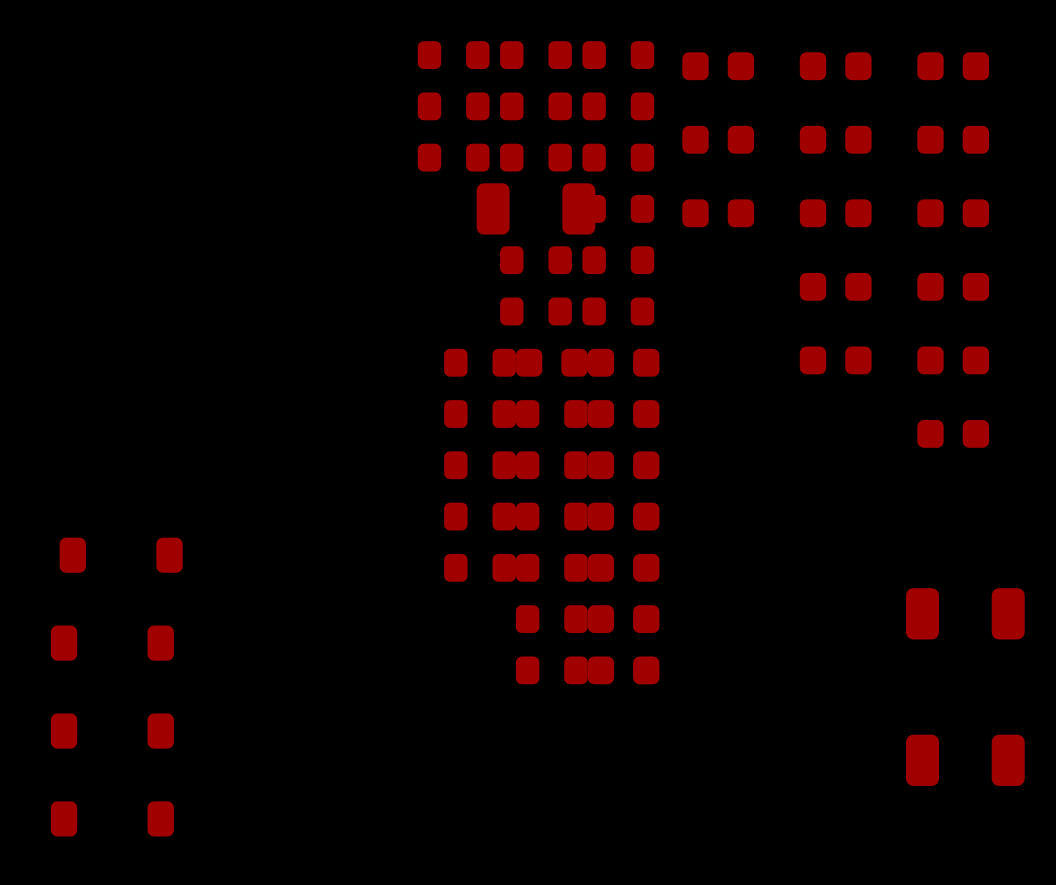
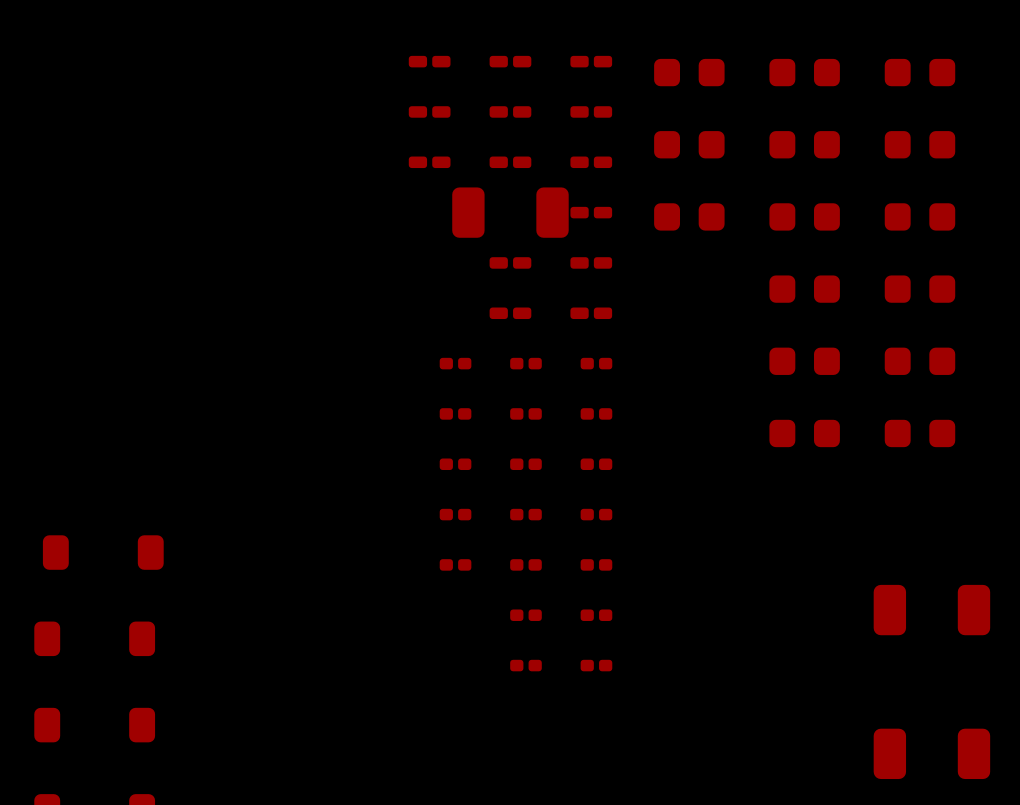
part footprint: [417, 41, 490, 70] -> [408, 55, 451, 68]
part footprint: [500, 41, 572, 70] -> [489, 55, 532, 68]
part footprint: [582, 41, 655, 70] -> [570, 55, 613, 68]
part footprint: [417, 92, 490, 121] -> [408, 106, 451, 118]
part footprint: [500, 92, 572, 121] -> [489, 106, 532, 118]
part footprint: [582, 92, 655, 121] -> [570, 106, 613, 118]
part footprint: [417, 143, 490, 172] -> [408, 156, 451, 169]
part footprint: [500, 143, 572, 172] -> [489, 156, 532, 169]
part footprint: [582, 143, 655, 172] -> [570, 156, 613, 169]
part footprint: [582, 194, 655, 223] -> [570, 206, 613, 219]
part footprint: [500, 246, 572, 275] -> [489, 257, 532, 269]
part footprint: [582, 246, 655, 275] -> [570, 257, 613, 269]
part footprint: [500, 297, 572, 326] -> [489, 307, 532, 320]
part footprint: [582, 297, 655, 326] -> [570, 307, 613, 320]
part footprint: [444, 348, 516, 377] -> [439, 357, 472, 370]
part footprint: [515, 348, 588, 377] -> [510, 357, 542, 370]
part footprint: [587, 348, 660, 377] -> [580, 357, 613, 370]
part footprint: [444, 400, 516, 428] -> [439, 408, 472, 420]
part footprint: [515, 400, 588, 428] -> [510, 408, 542, 420]
part footprint: [587, 400, 660, 428] -> [580, 408, 613, 420]
part: none -> (804, 433)
part footprint: [444, 451, 516, 480] -> [439, 458, 472, 471]
part footprint: [515, 451, 588, 480] -> [510, 458, 542, 471]
part footprint: [587, 451, 660, 480] -> [580, 458, 613, 471]
part footprint: [444, 502, 516, 531] -> [439, 508, 472, 521]
part footprint: [515, 502, 588, 531] -> [510, 508, 542, 521]
part footprint: [587, 502, 660, 531] -> [580, 508, 613, 521]
part footprint: [444, 553, 516, 582] -> [439, 559, 472, 571]
part footprint: [515, 553, 588, 582] -> [510, 559, 542, 571]
part footprint: [587, 553, 660, 582] -> [580, 559, 613, 571]
part footprint: [515, 605, 588, 634] -> [510, 609, 542, 621]
part footprint: [587, 605, 660, 634] -> [580, 609, 613, 621]
part footprint: [515, 656, 588, 685] -> [510, 659, 542, 672]
part footprint: [587, 656, 660, 685] -> [580, 659, 613, 672]

